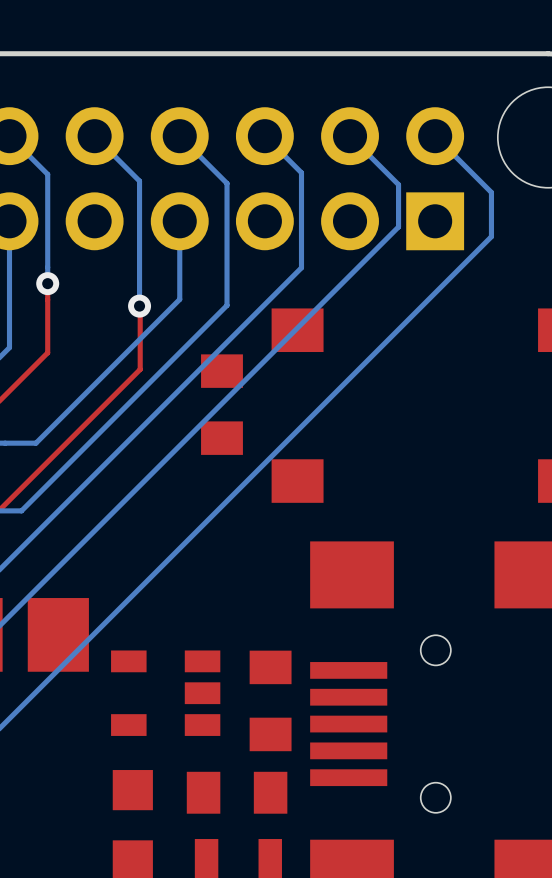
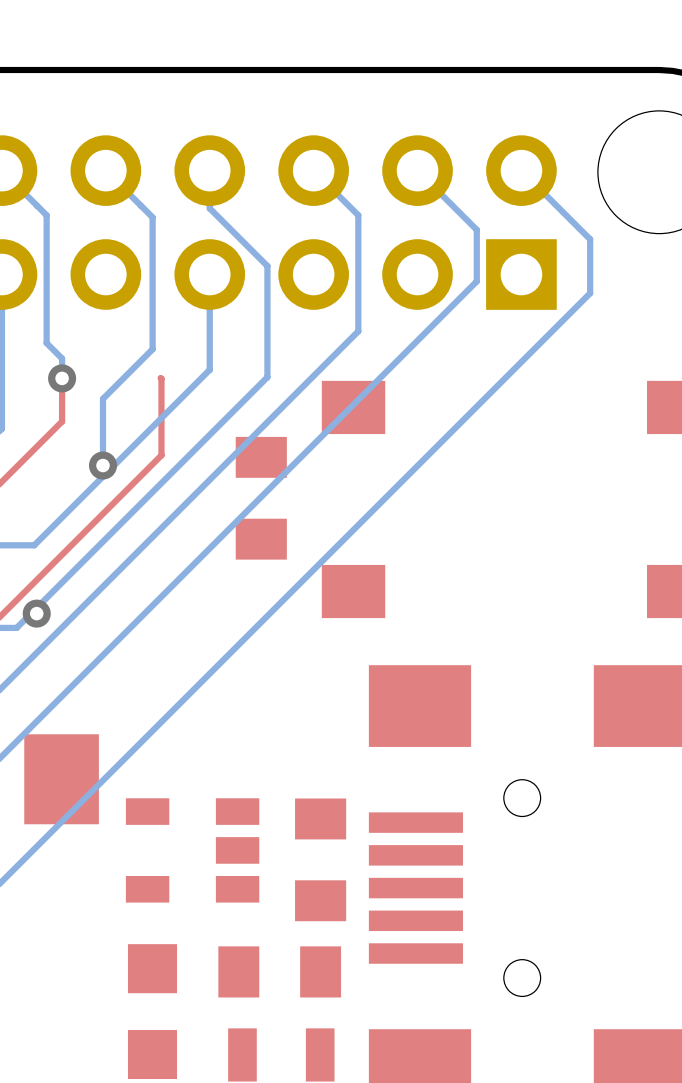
bottom track: (179, 136) (227, 183) (227, 214) -> (209, 170) (209, 208) (267, 266)
bottom track: (46, 172) (47, 174) (47, 283) -> (46, 215) (46, 343) (62, 358) (62, 378)
bottom track: (132, 174) (139, 181) (139, 306) -> (152, 217) (152, 349) (103, 398) (103, 465)
top track: (47, 283) (47, 352) -> (62, 378) (62, 421) (48, 435)
via position: (47, 283) -> (62, 378)
via: (139, 306) -> none
via: none -> (103, 465)
via: none -> (36, 613)

